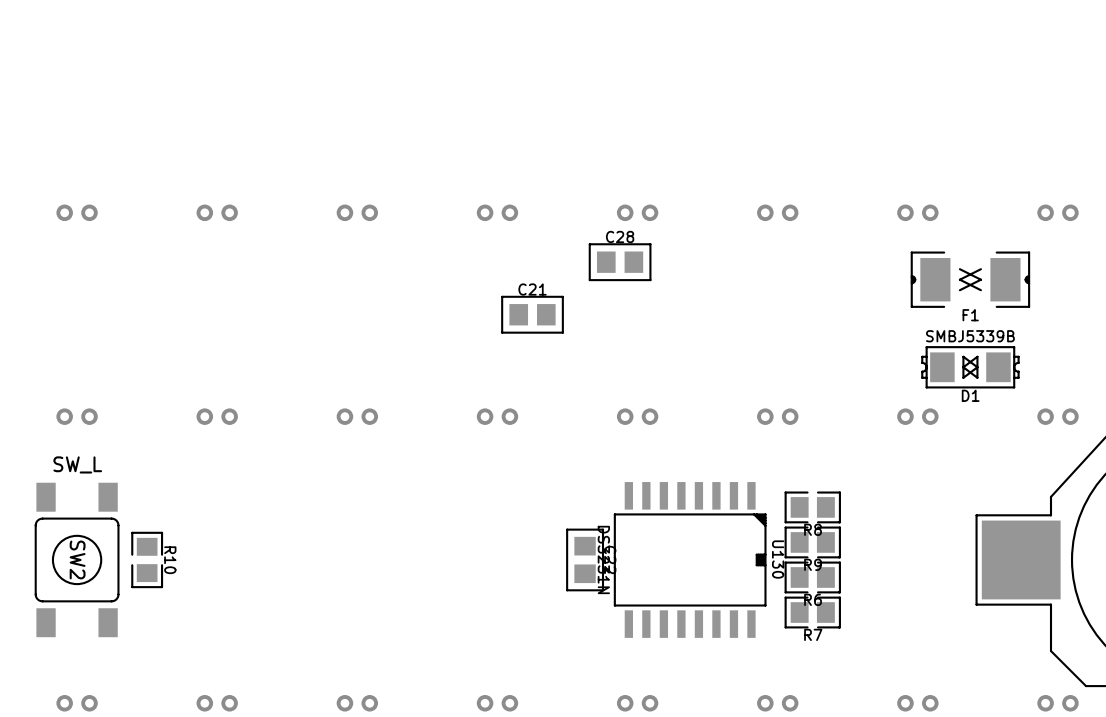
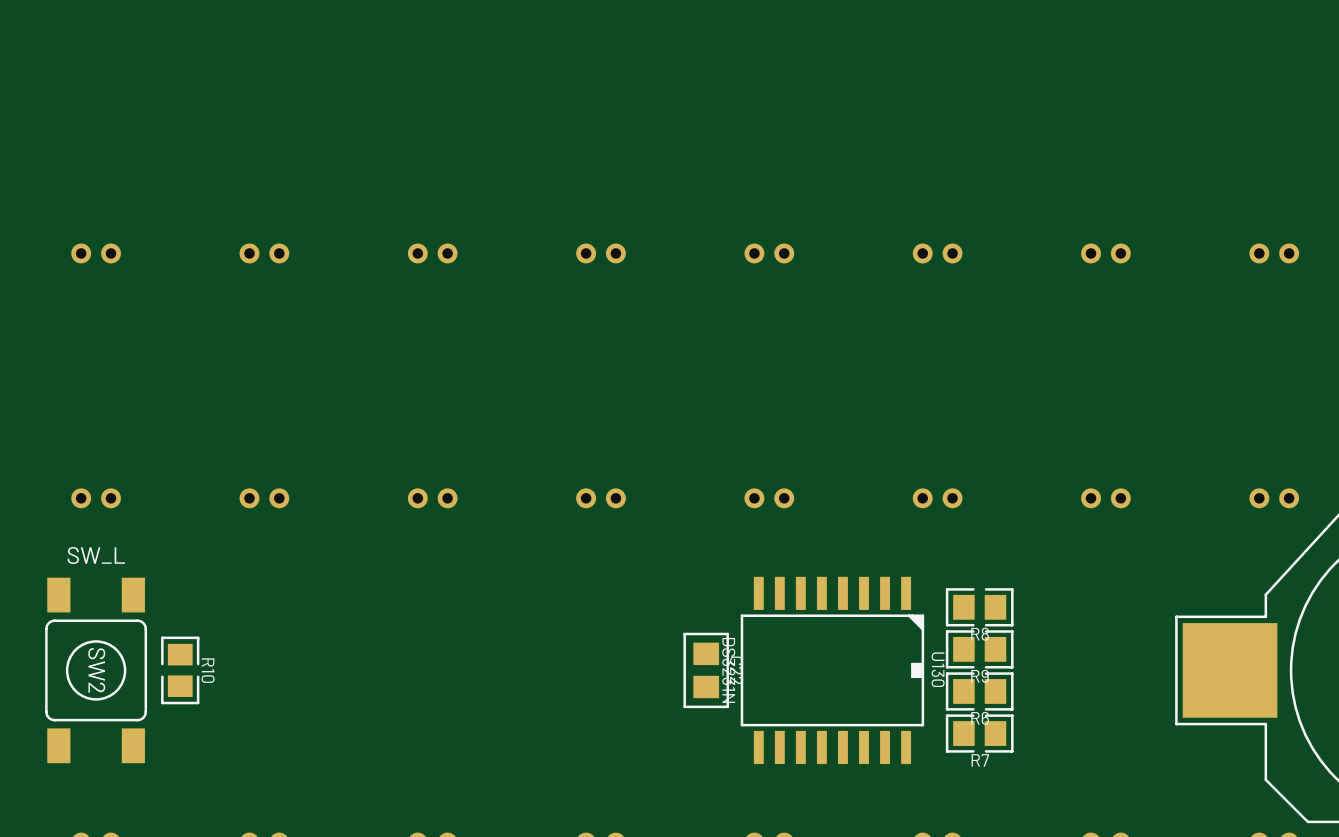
C28: (620, 262) -> none
F1: (970, 279) -> none
C21: (532, 314) -> none
D1: SMBJ5339B (970, 367) -> none

